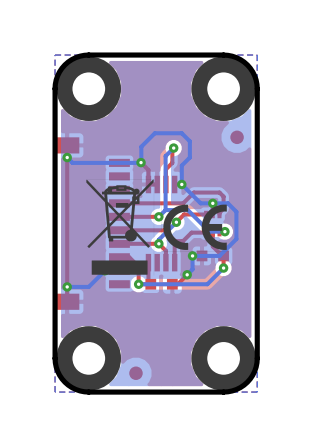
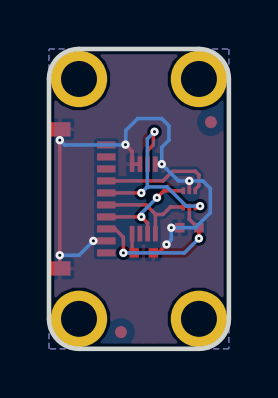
part footprint: [56, 56, 122, 121] -> [50, 50, 108, 108]
part footprint: [191, 56, 256, 121] -> [170, 50, 228, 108]
drawing: [86, 179, 230, 276] -> none
part footprint: [56, 326, 122, 391] -> [50, 290, 108, 348]
part footprint: [191, 326, 256, 391] -> [170, 290, 228, 348]

